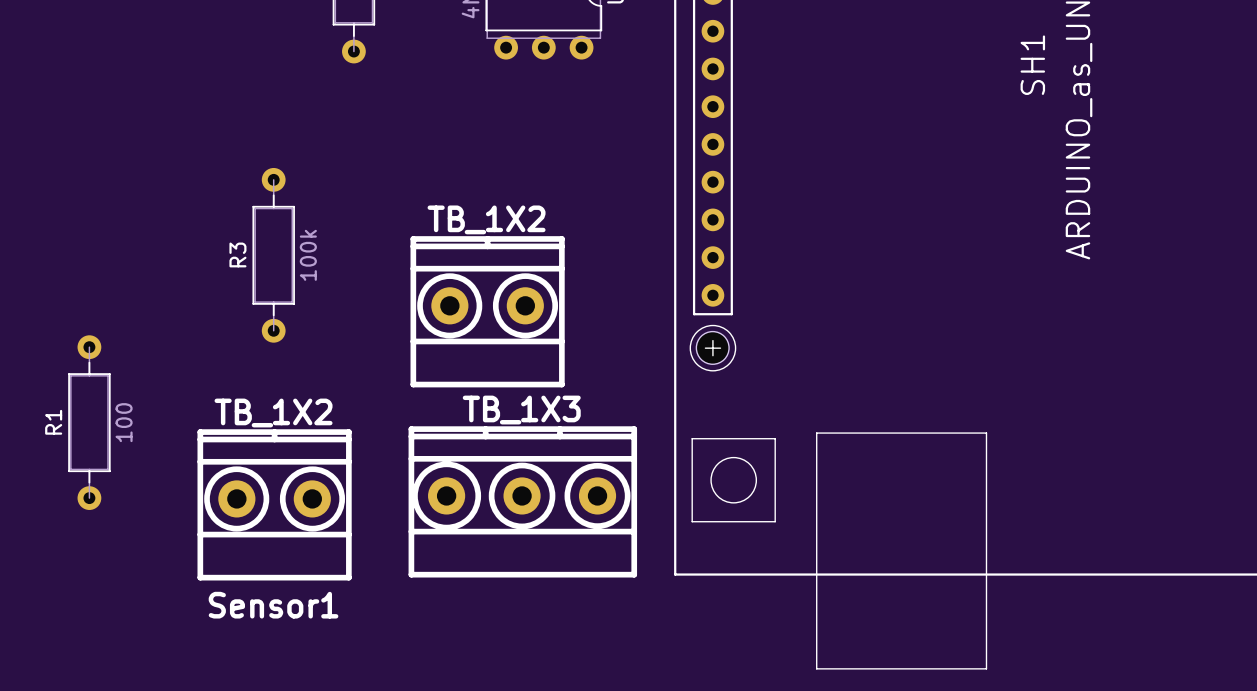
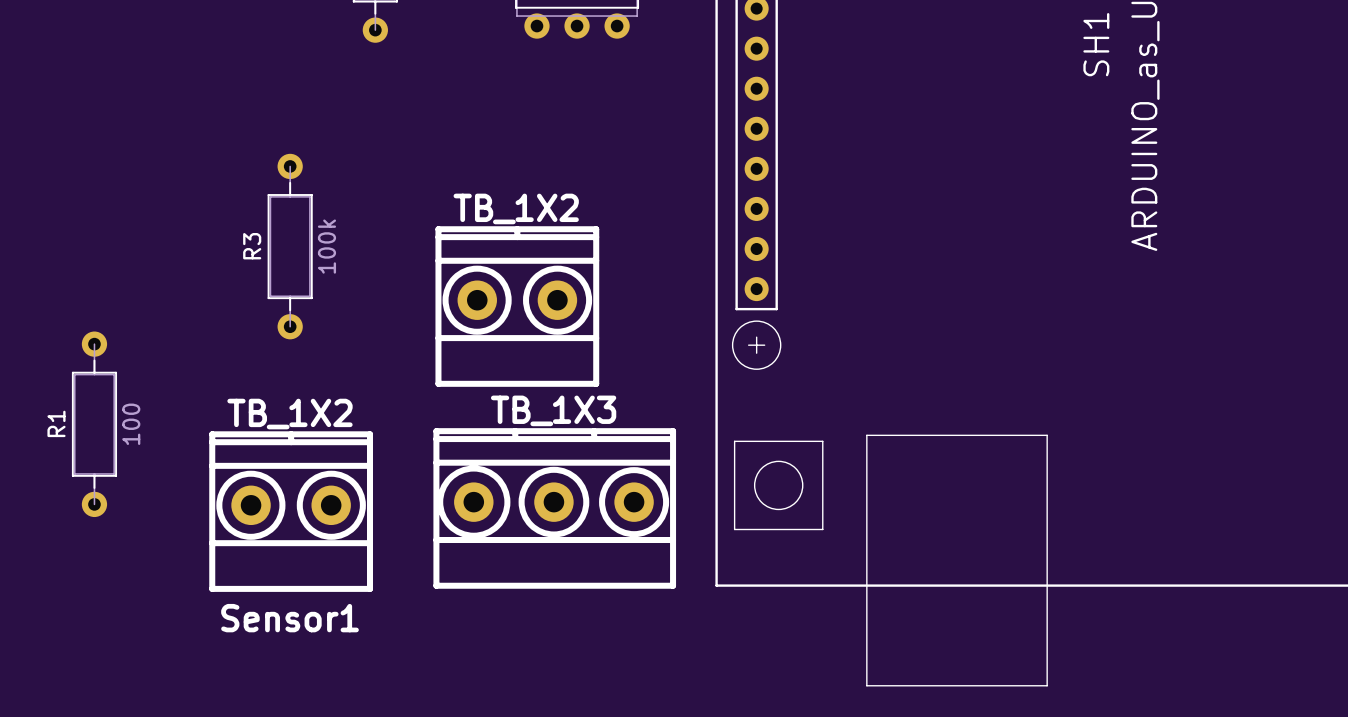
part: (712, 347) -> none

